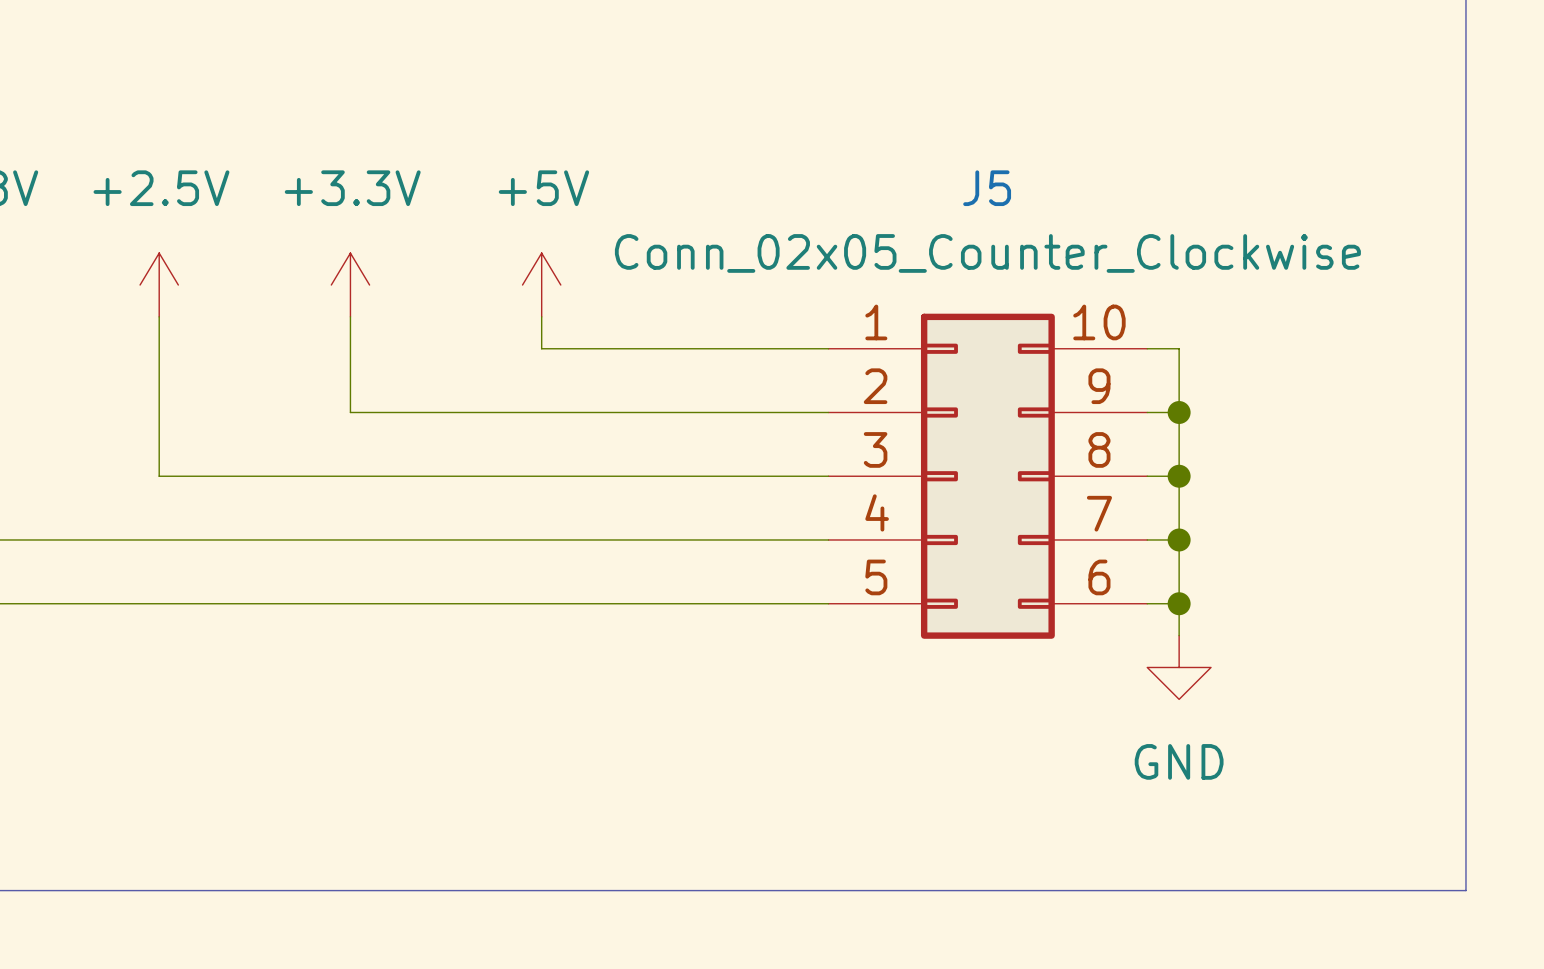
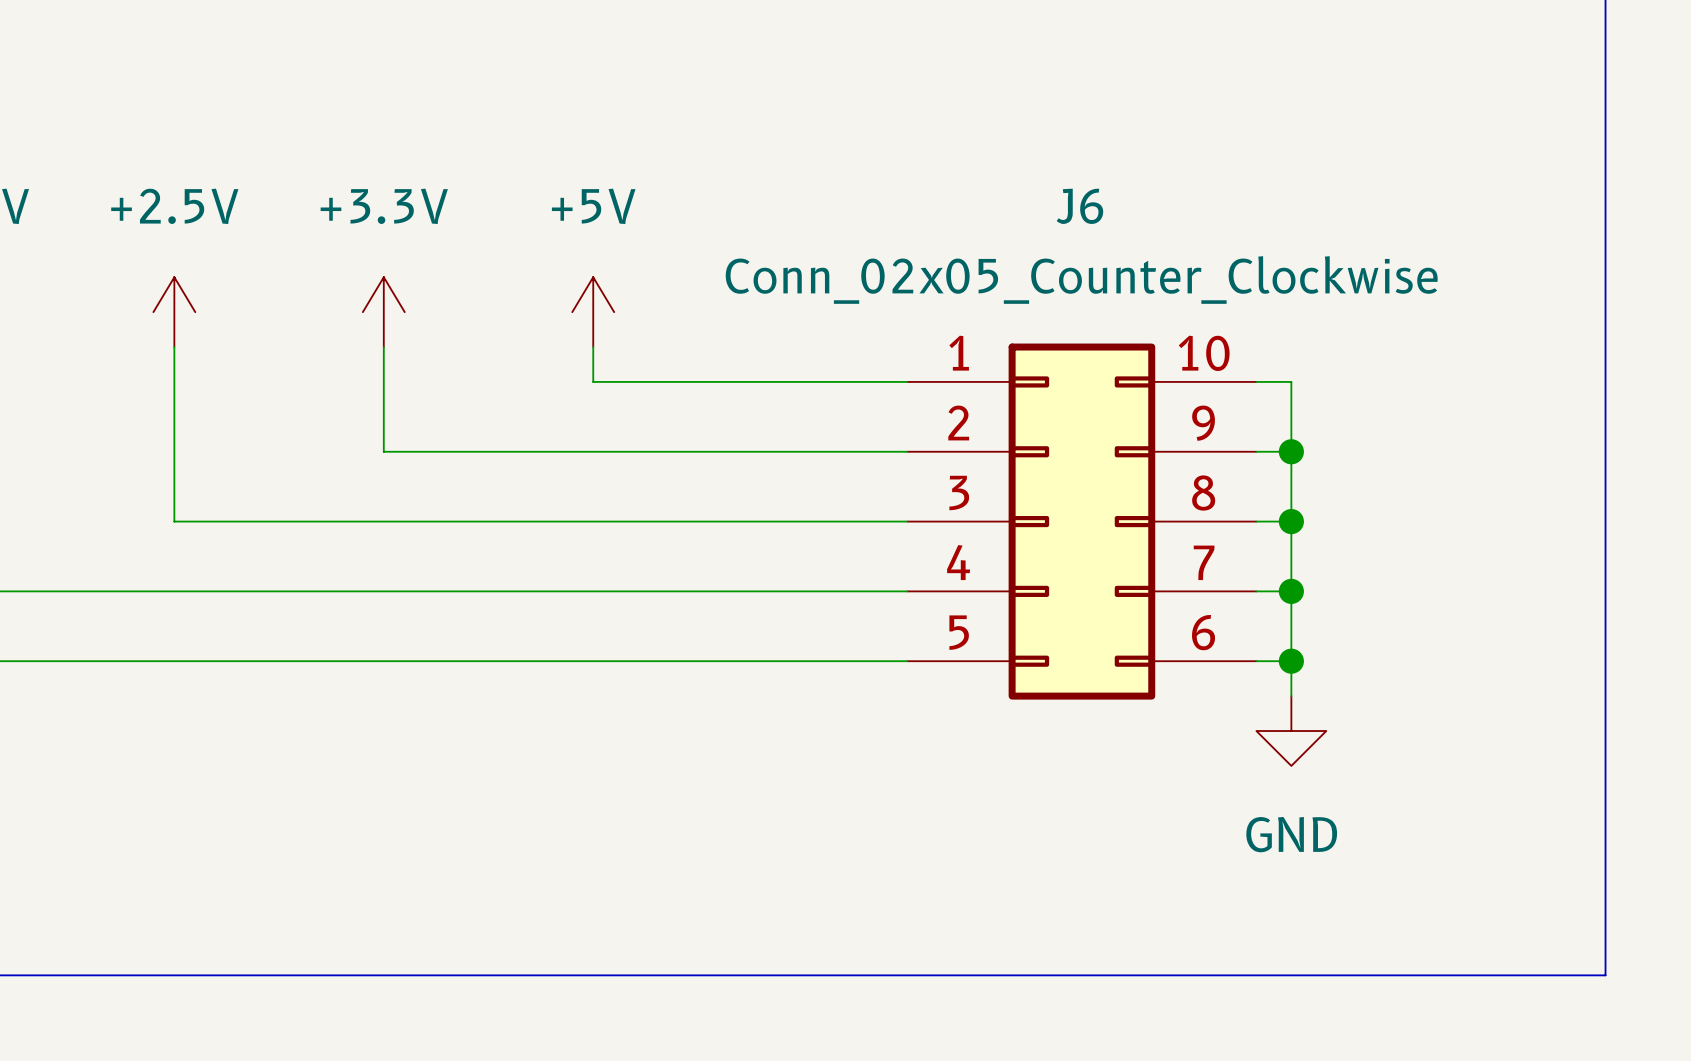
J5 name: J5 (987, 188) -> J6 (1079, 206)

